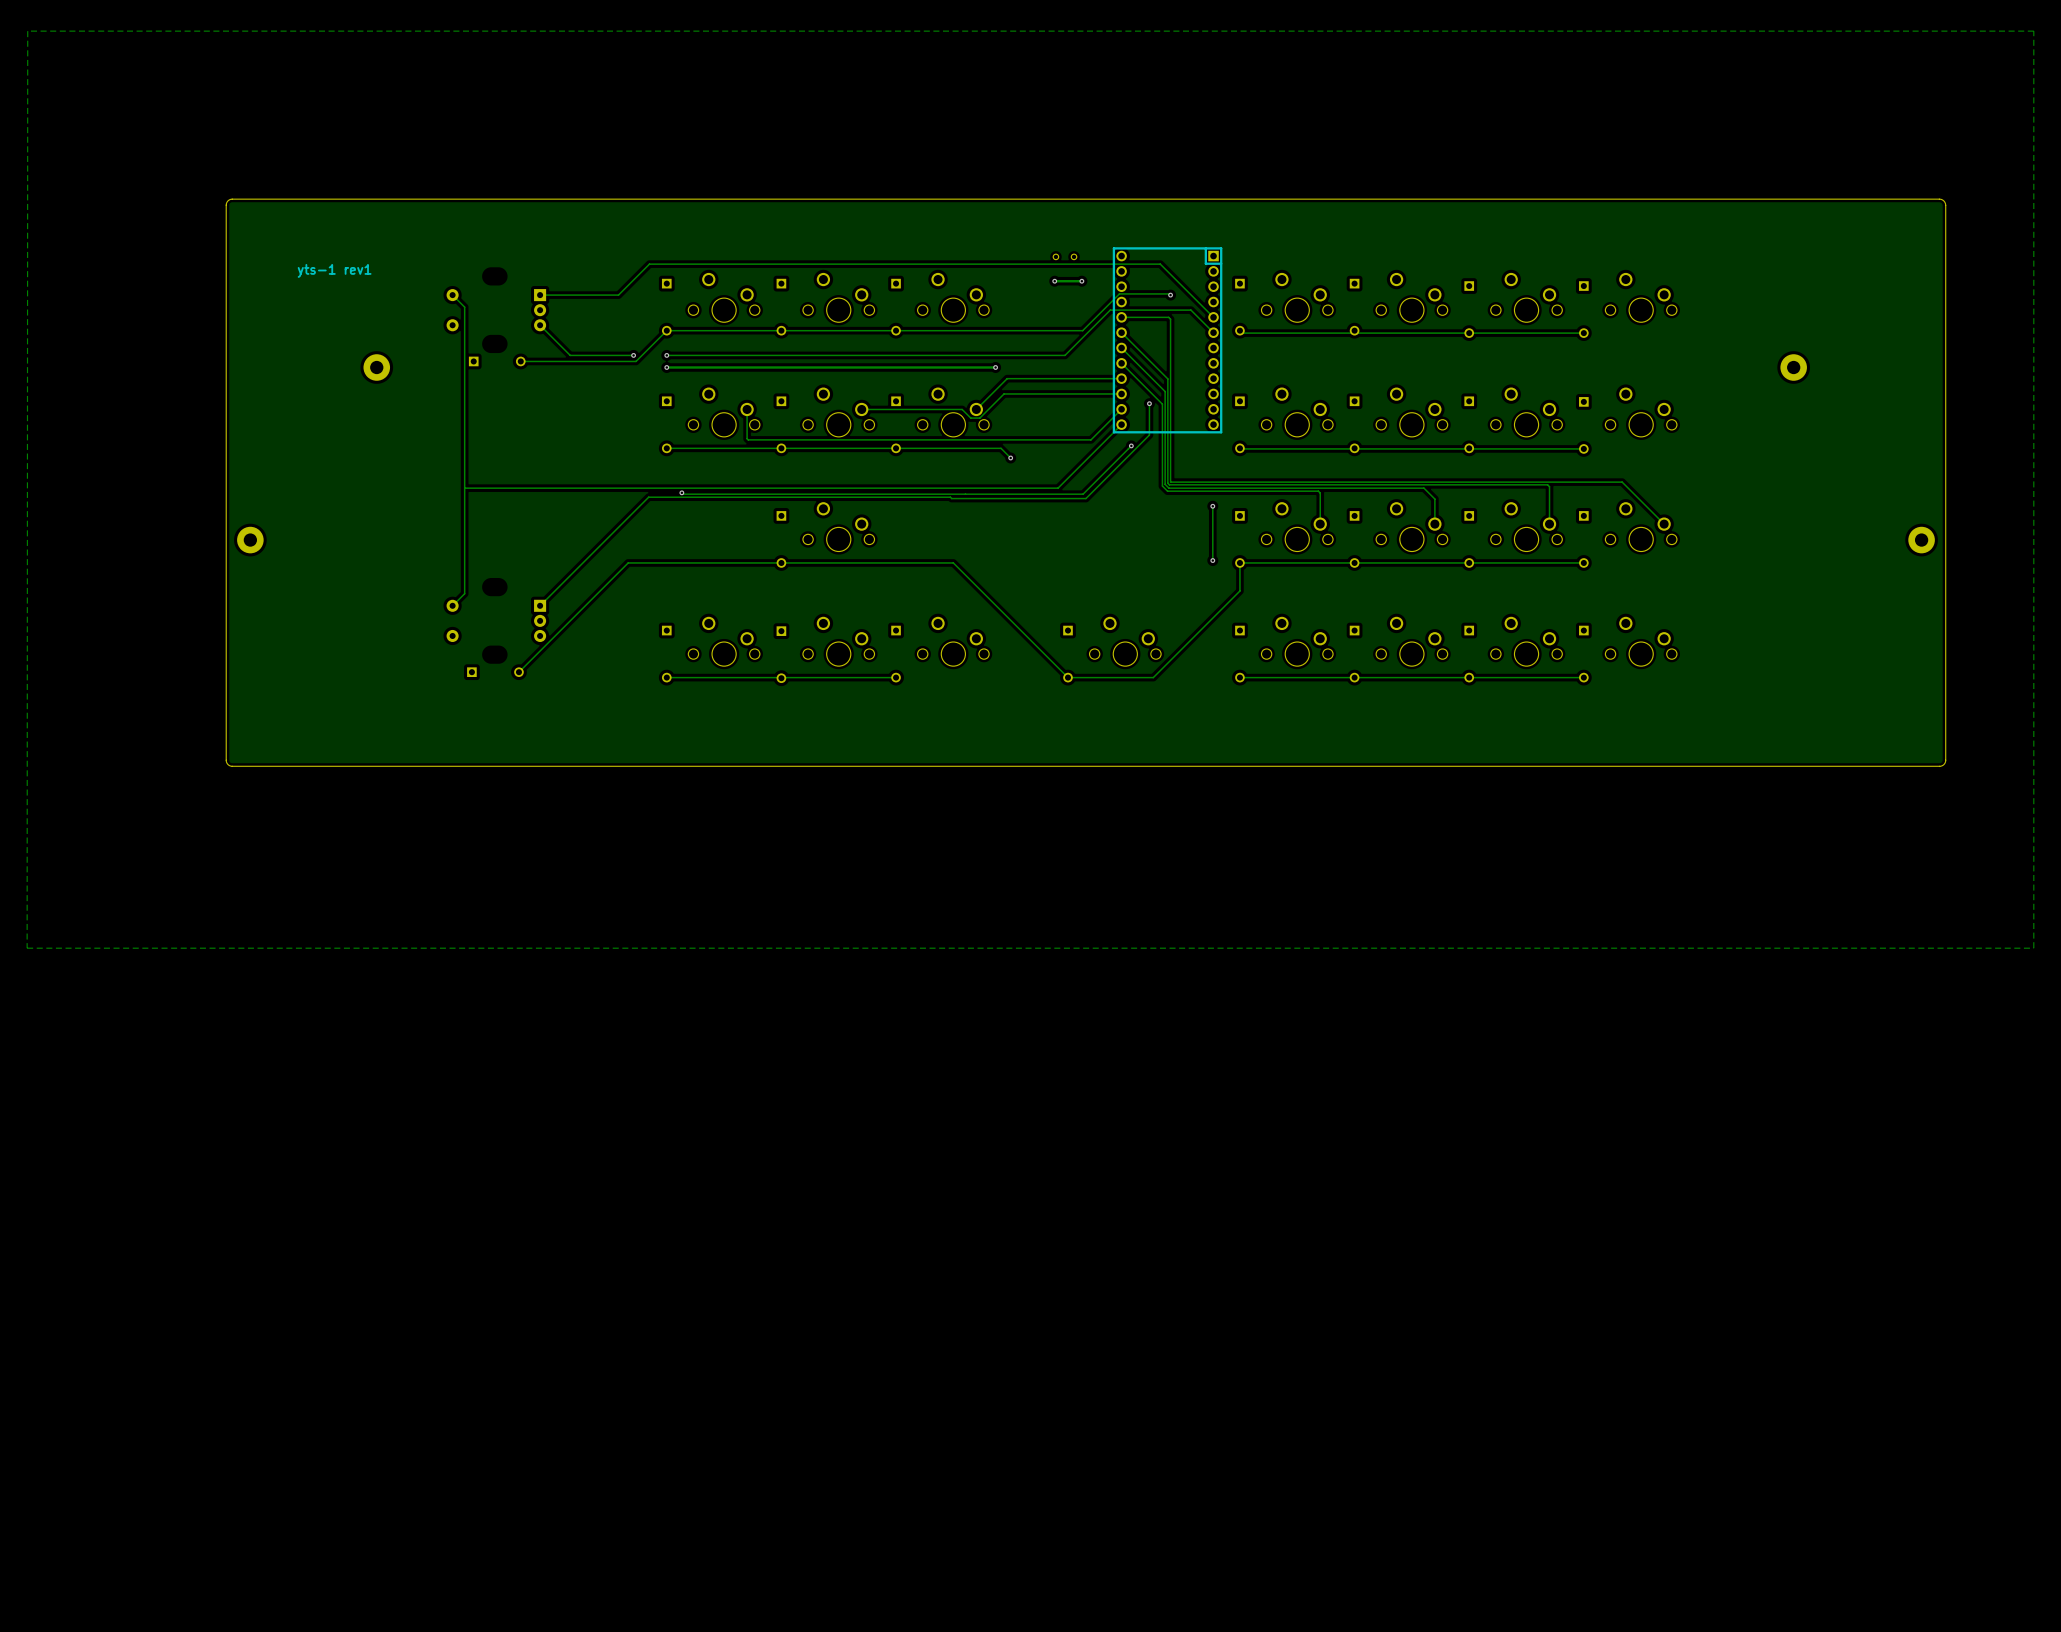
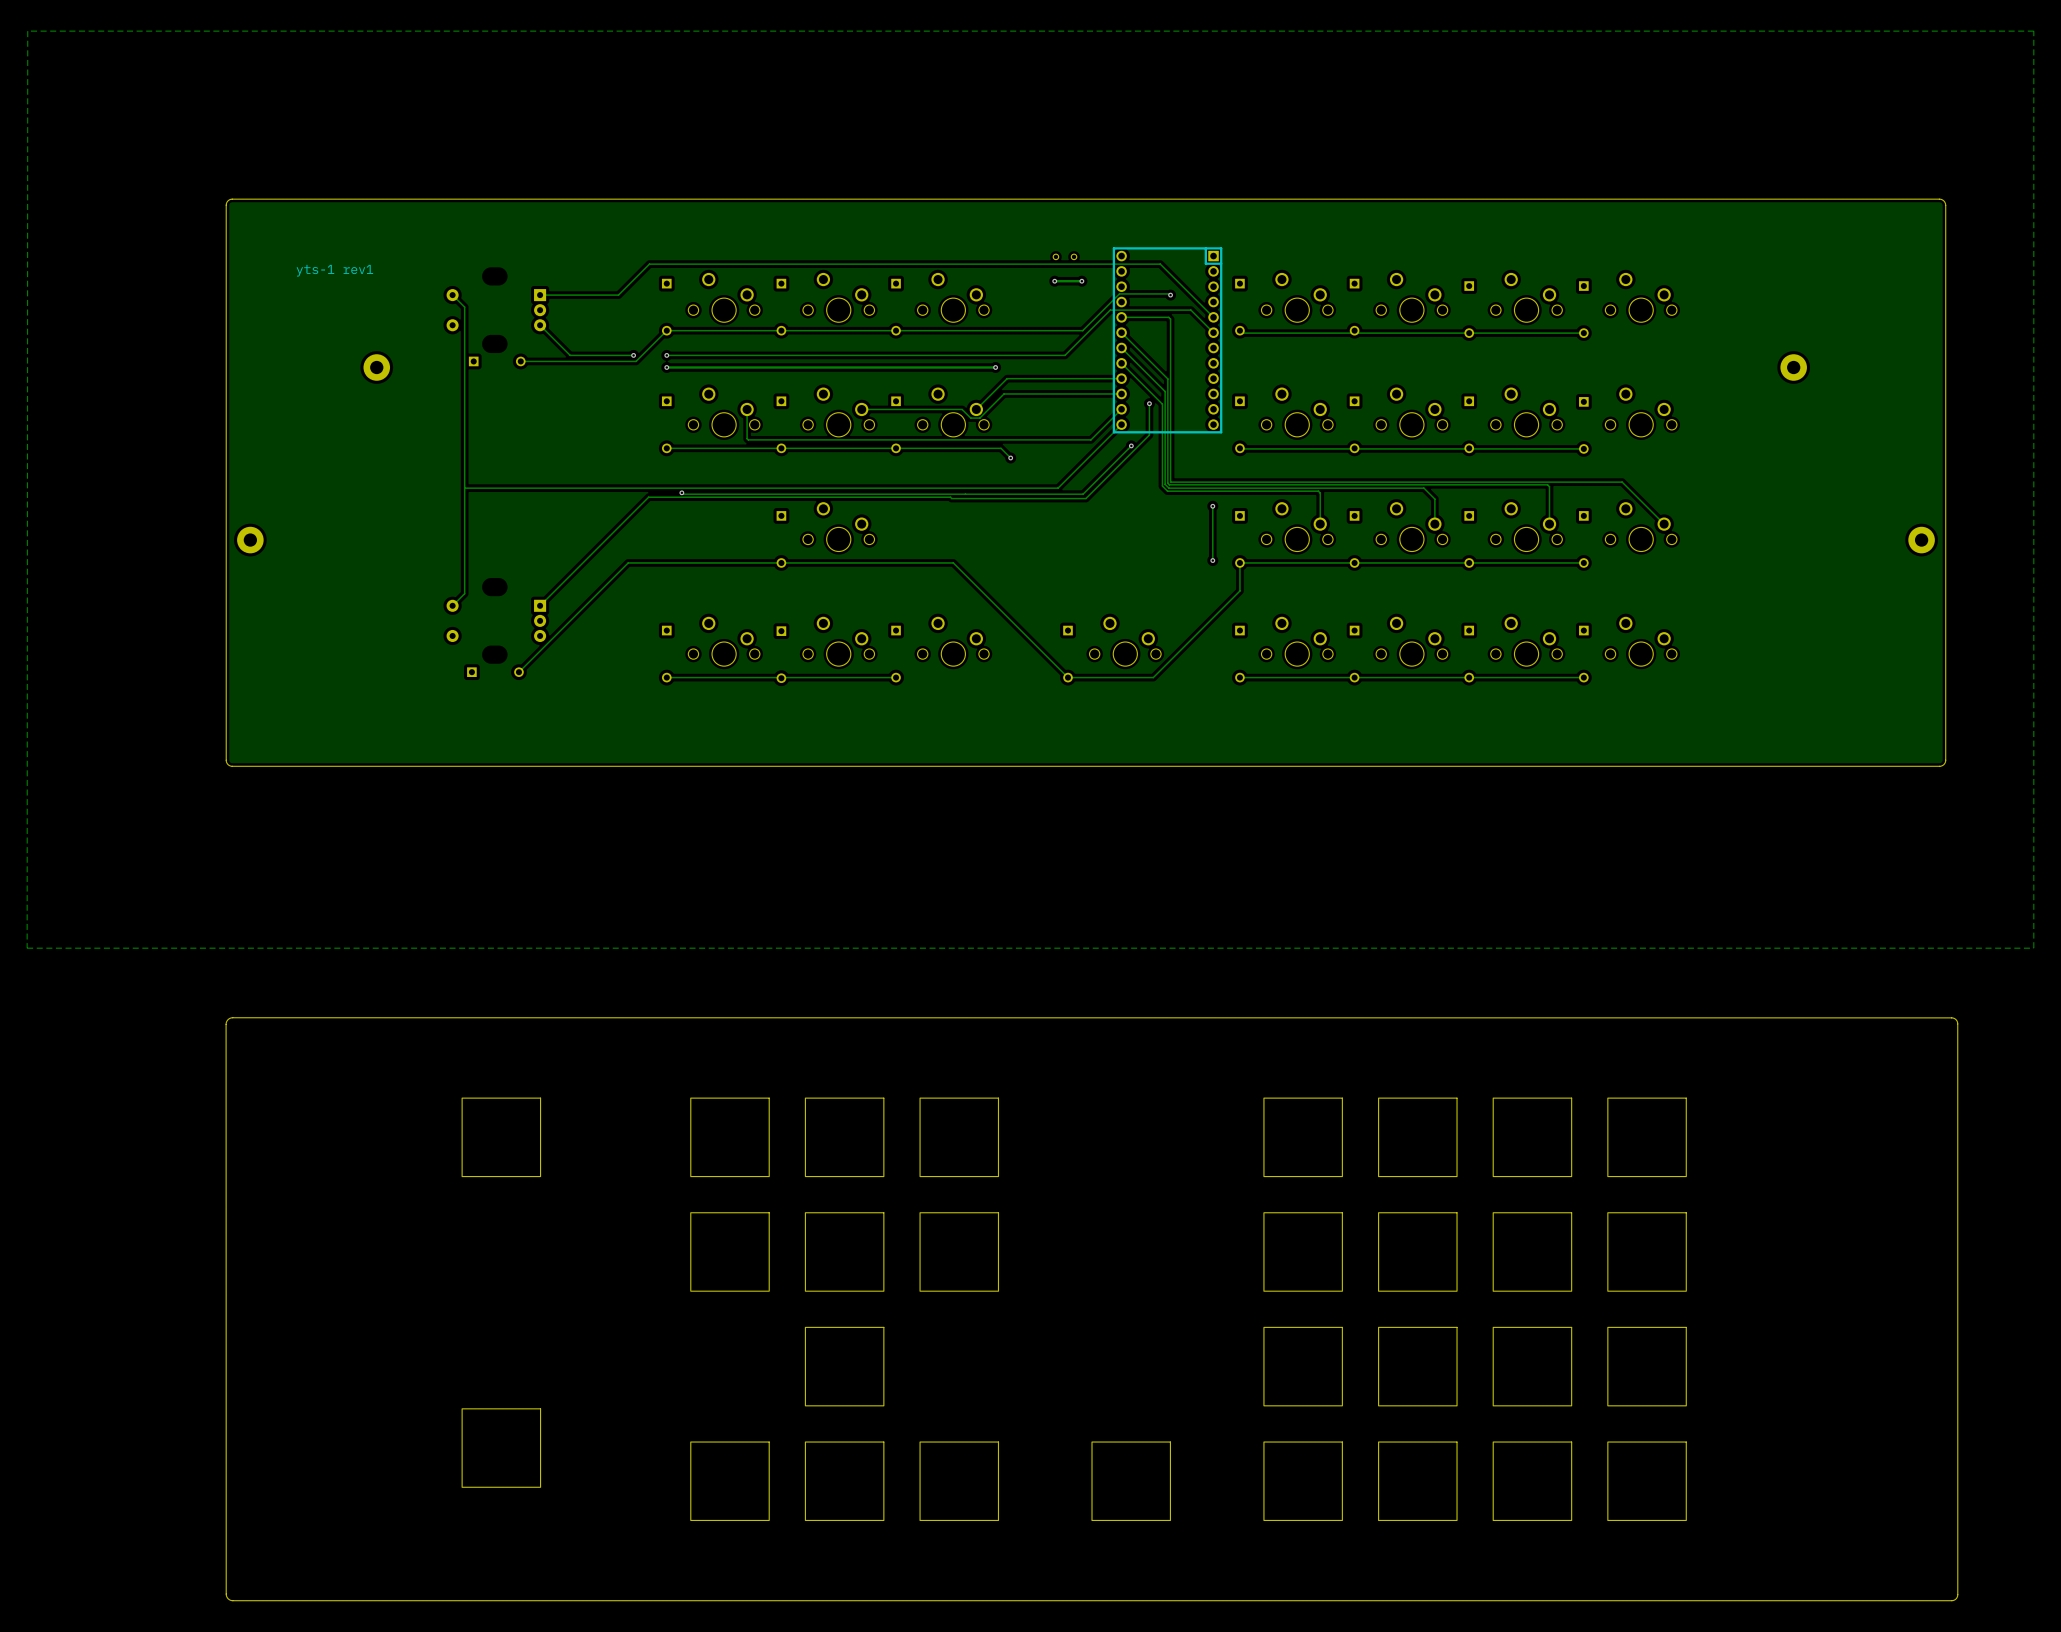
drawing: none -> [225, 1017, 1959, 1602]

